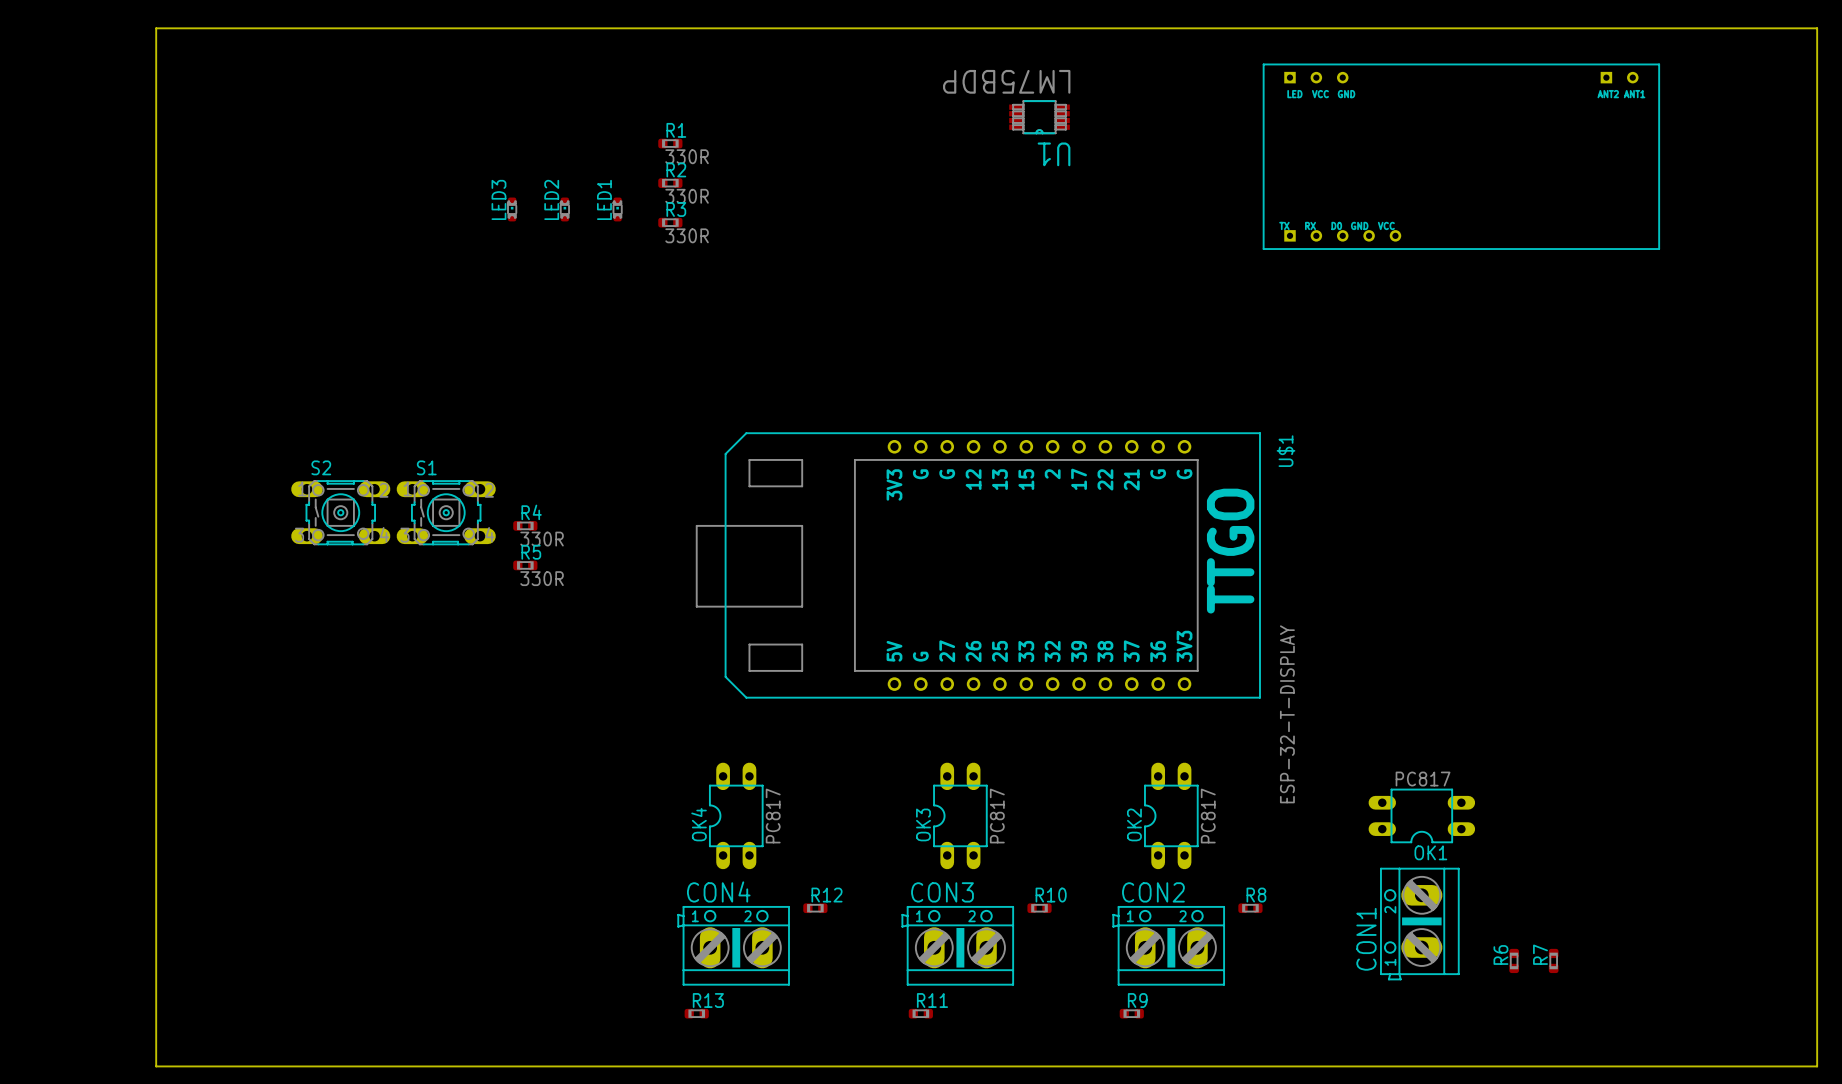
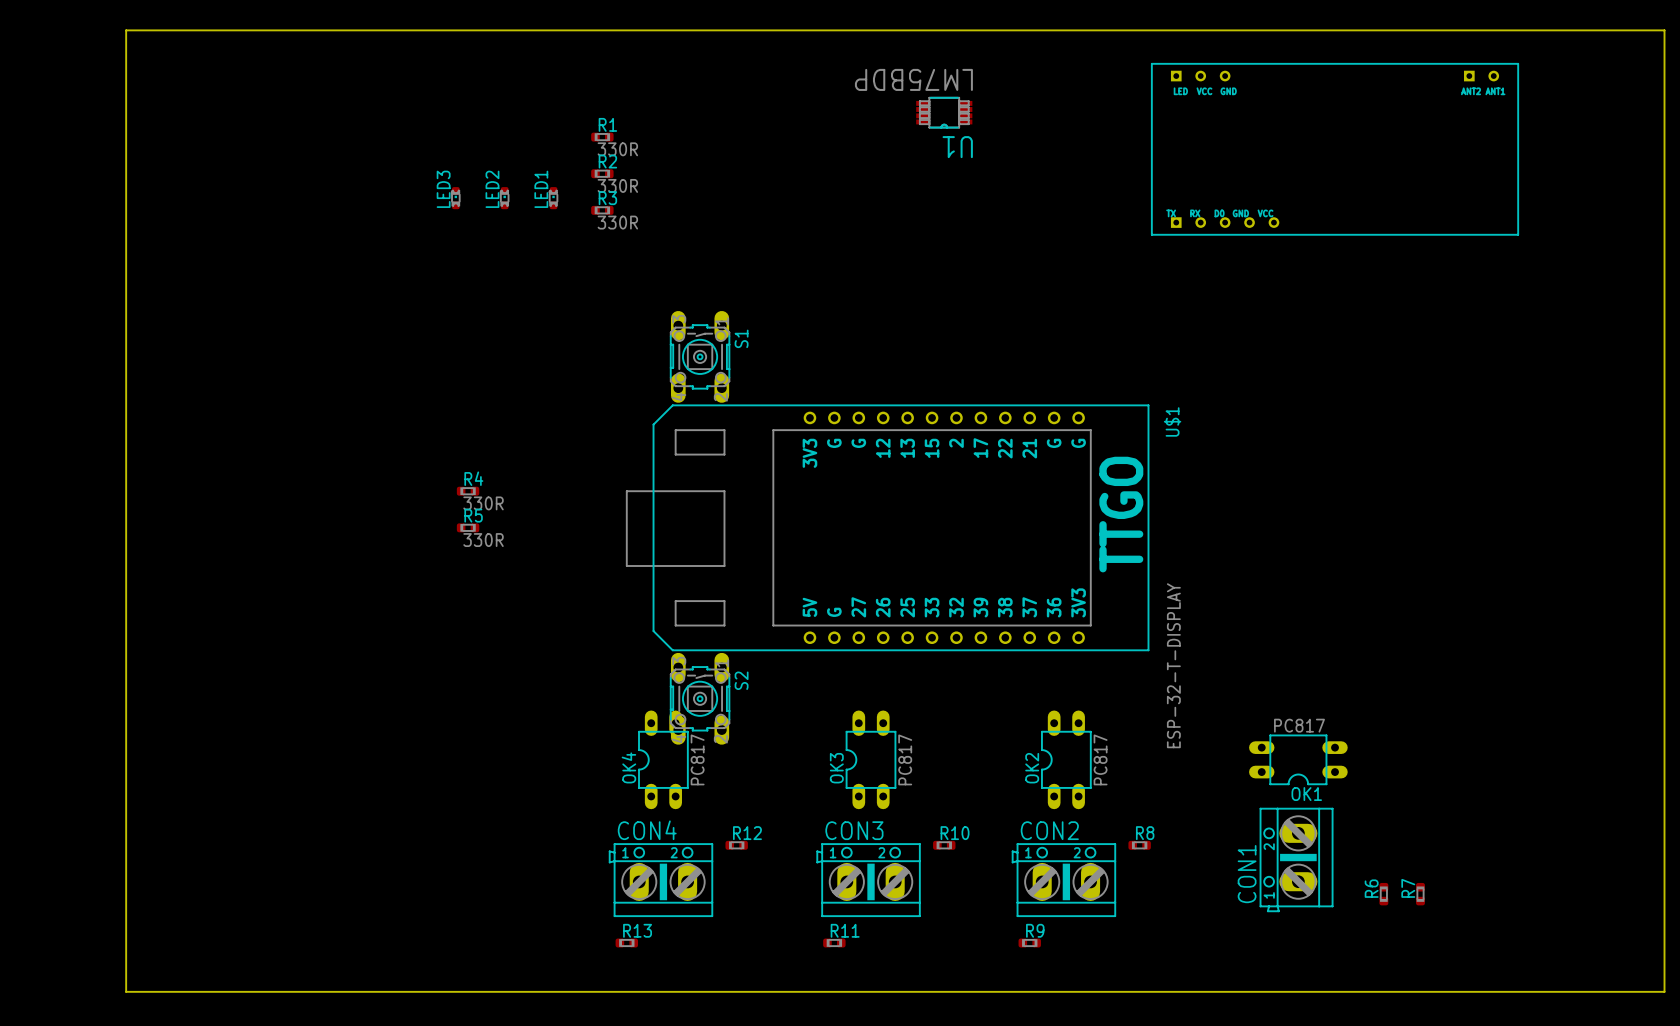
S2 name position: S2 (321, 467) -> S2 (741, 680)
S1 name position: S1 (426, 467) -> S1 (741, 338)
S2 footprint: [291, 480, 391, 546] -> [670, 652, 731, 745]
S1 footprint: [396, 480, 496, 546] -> [670, 310, 731, 403]

